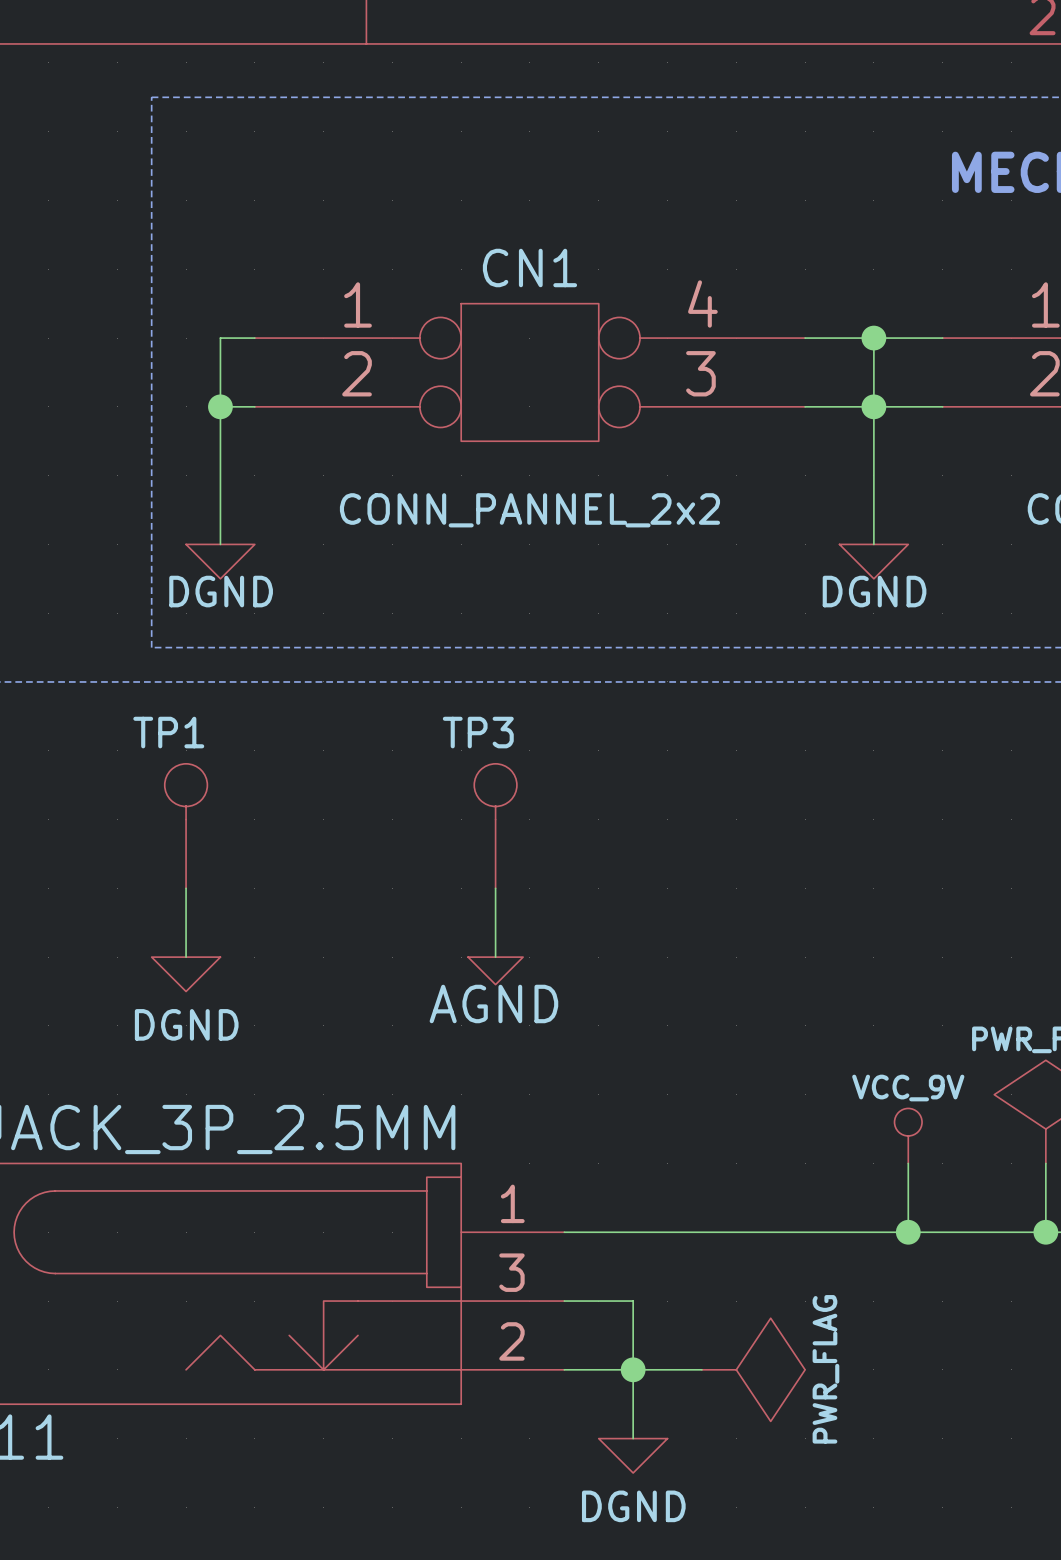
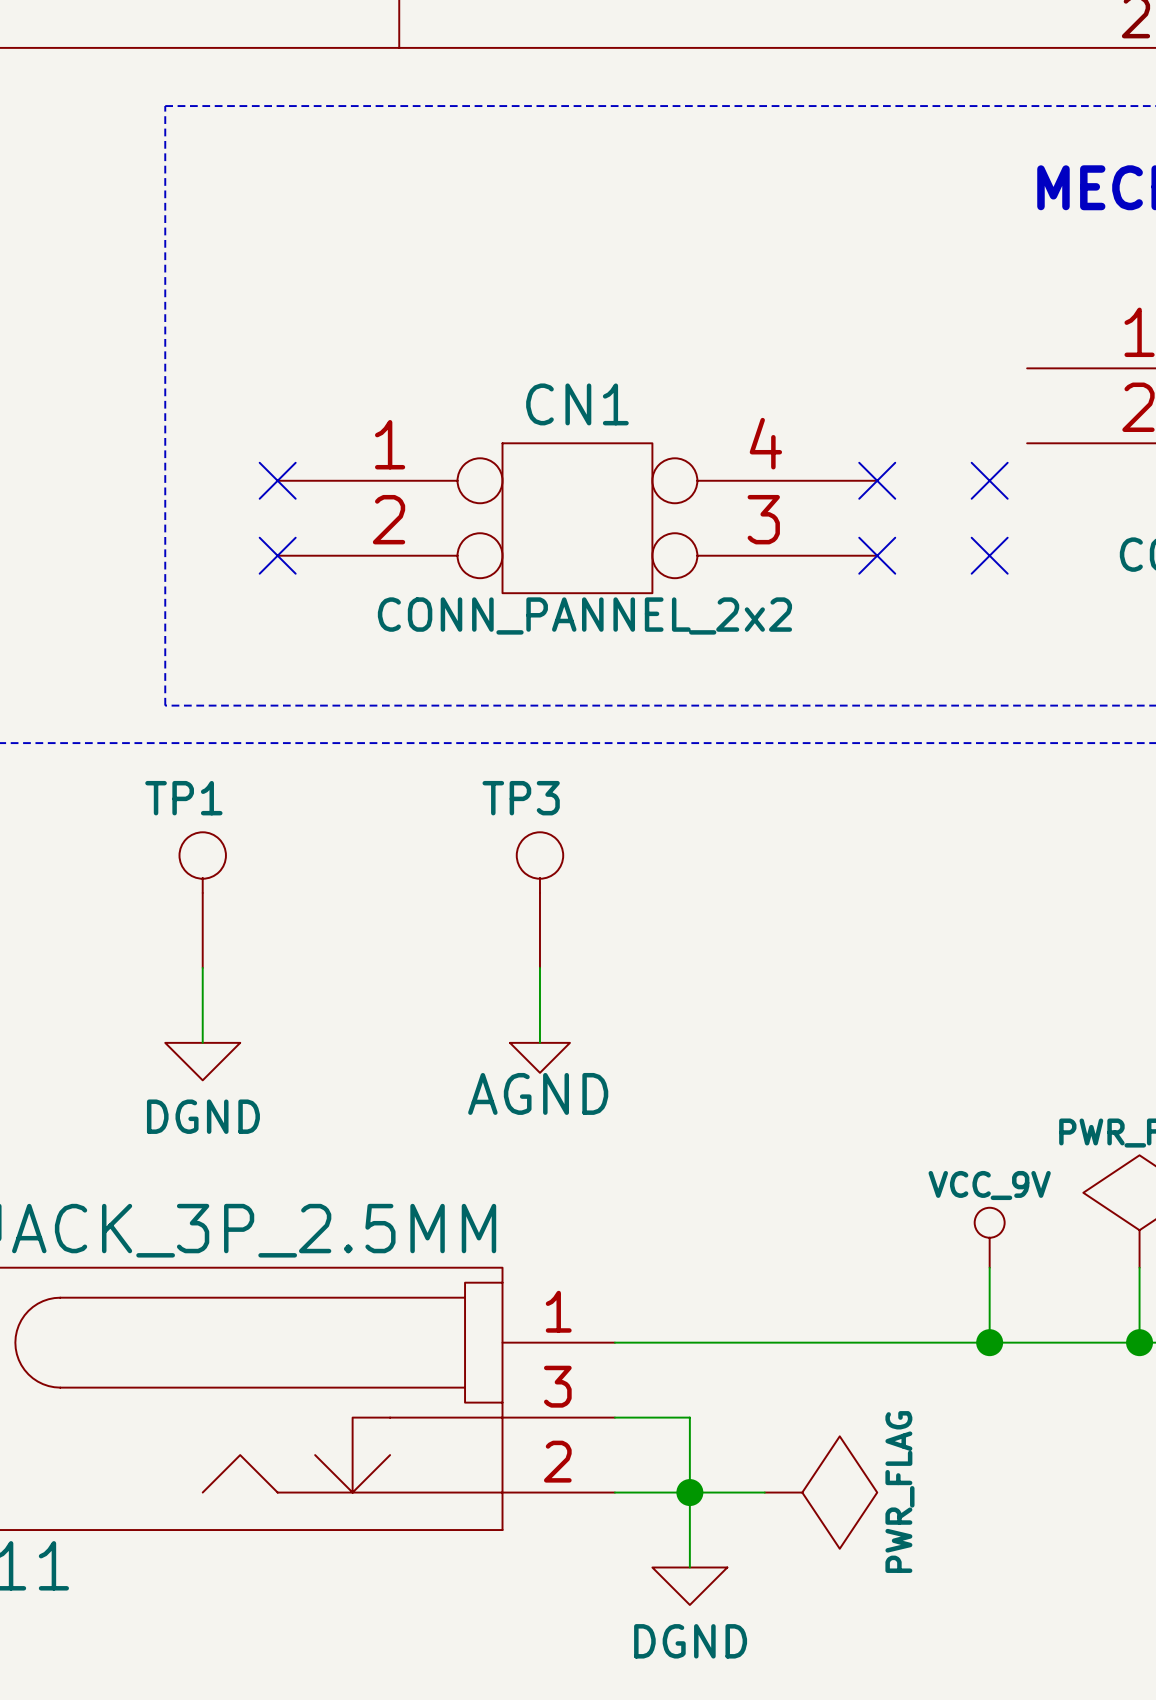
wire: (254, 338) (220, 338) (220, 544) -> none
wire: (805, 338) (942, 338) -> none
wire: (873, 338) (873, 544) -> none
junction: (873, 338) -> none
CN1 position: (529, 372) -> (577, 518)
wire: (220, 406) (254, 406) -> none
junction: (220, 406) -> none
wire: (805, 406) (942, 406) -> none
junction: (873, 406) -> none
no-connect mark: none -> (277, 480)
no-connect mark: none -> (877, 480)
no-connect mark: none -> (989, 480)
no-connect mark: none -> (277, 555)
CN1 value position: CONN_PANNEL_2x2 (529, 510) -> CONN_PANNEL_2x2 (584, 615)
no-connect mark: none -> (877, 555)
no-connect mark: none -> (989, 555)
power symbol: DGND (220, 561) -> none
power symbol: DGND (873, 561) -> none

